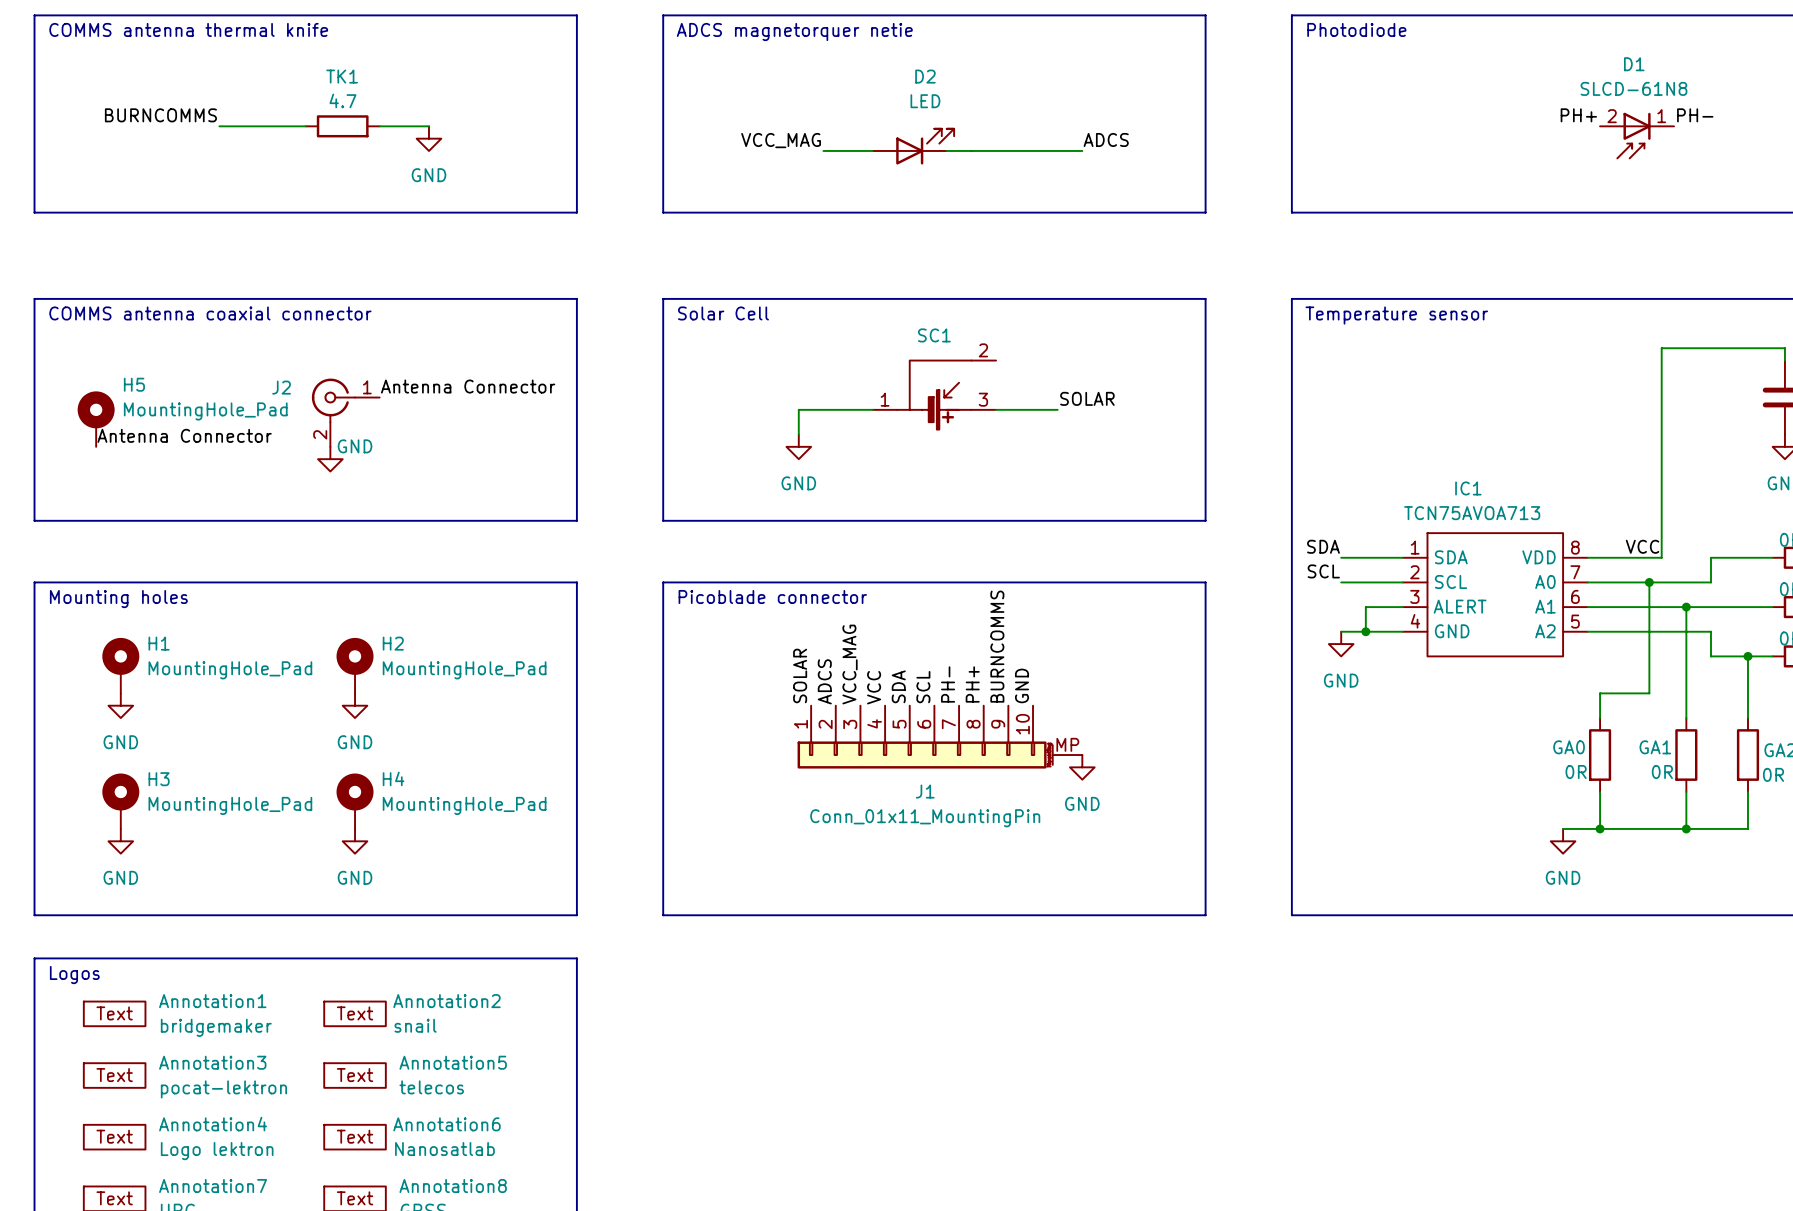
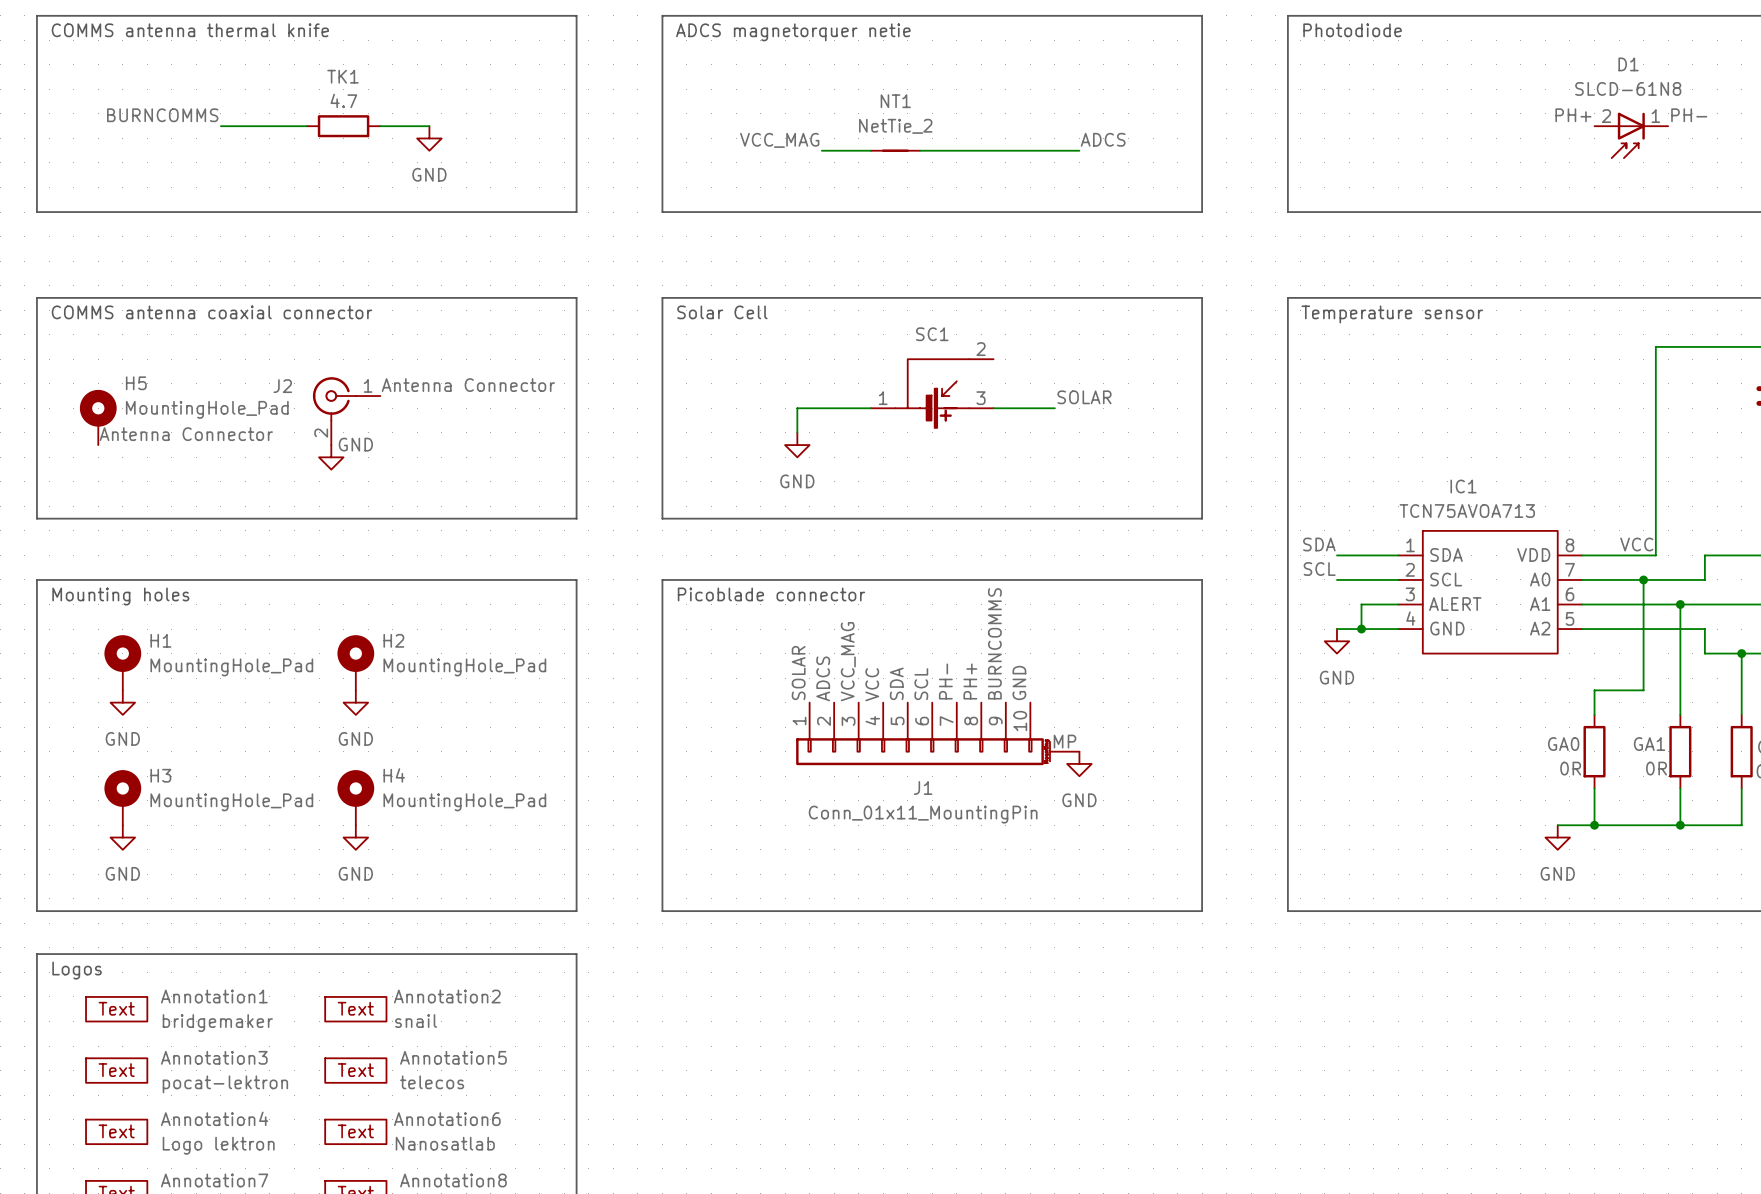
D2: LED (913, 146) -> none
NT1: none -> NetTie_2 (895, 150)

